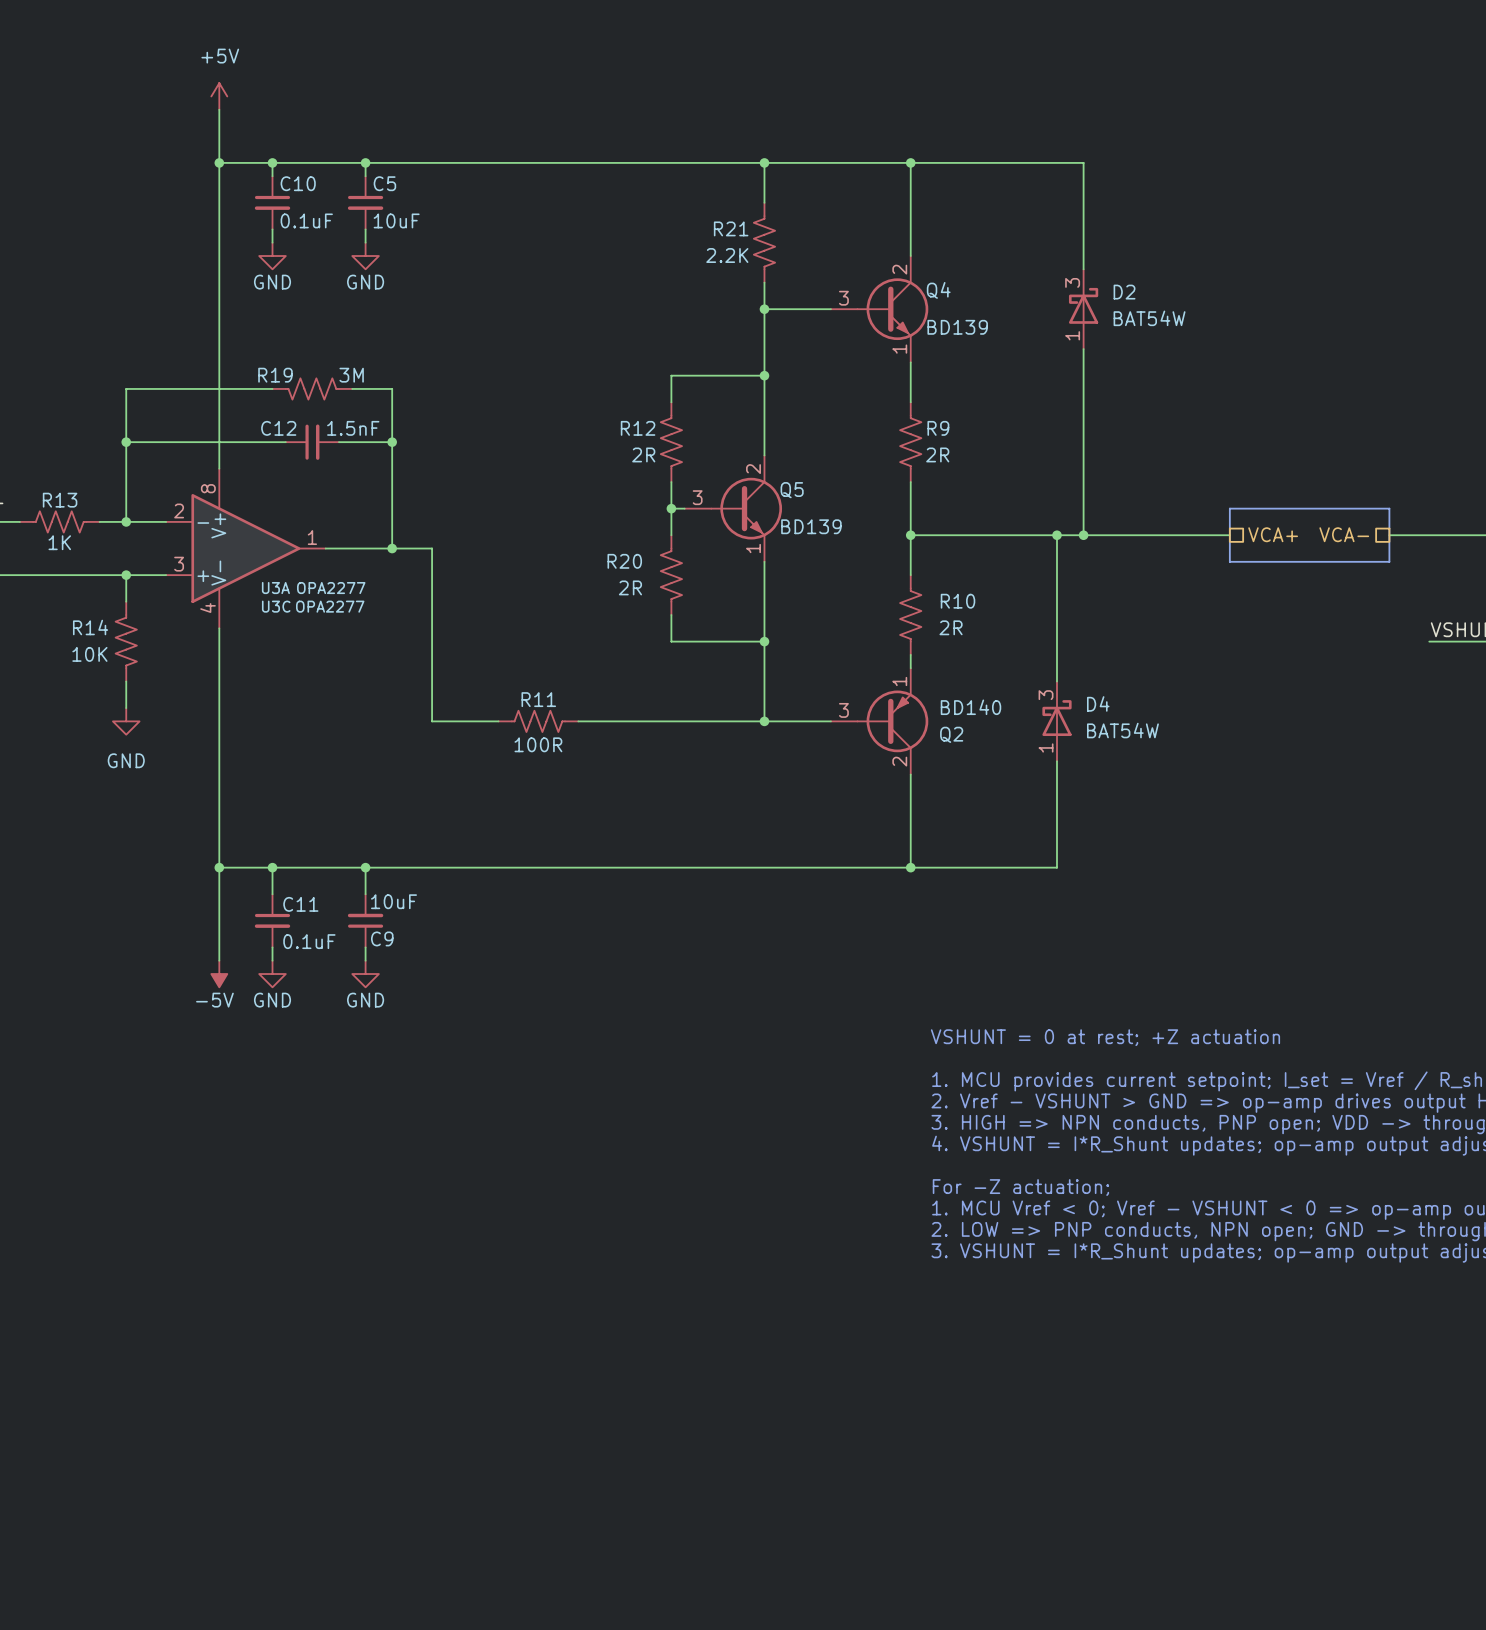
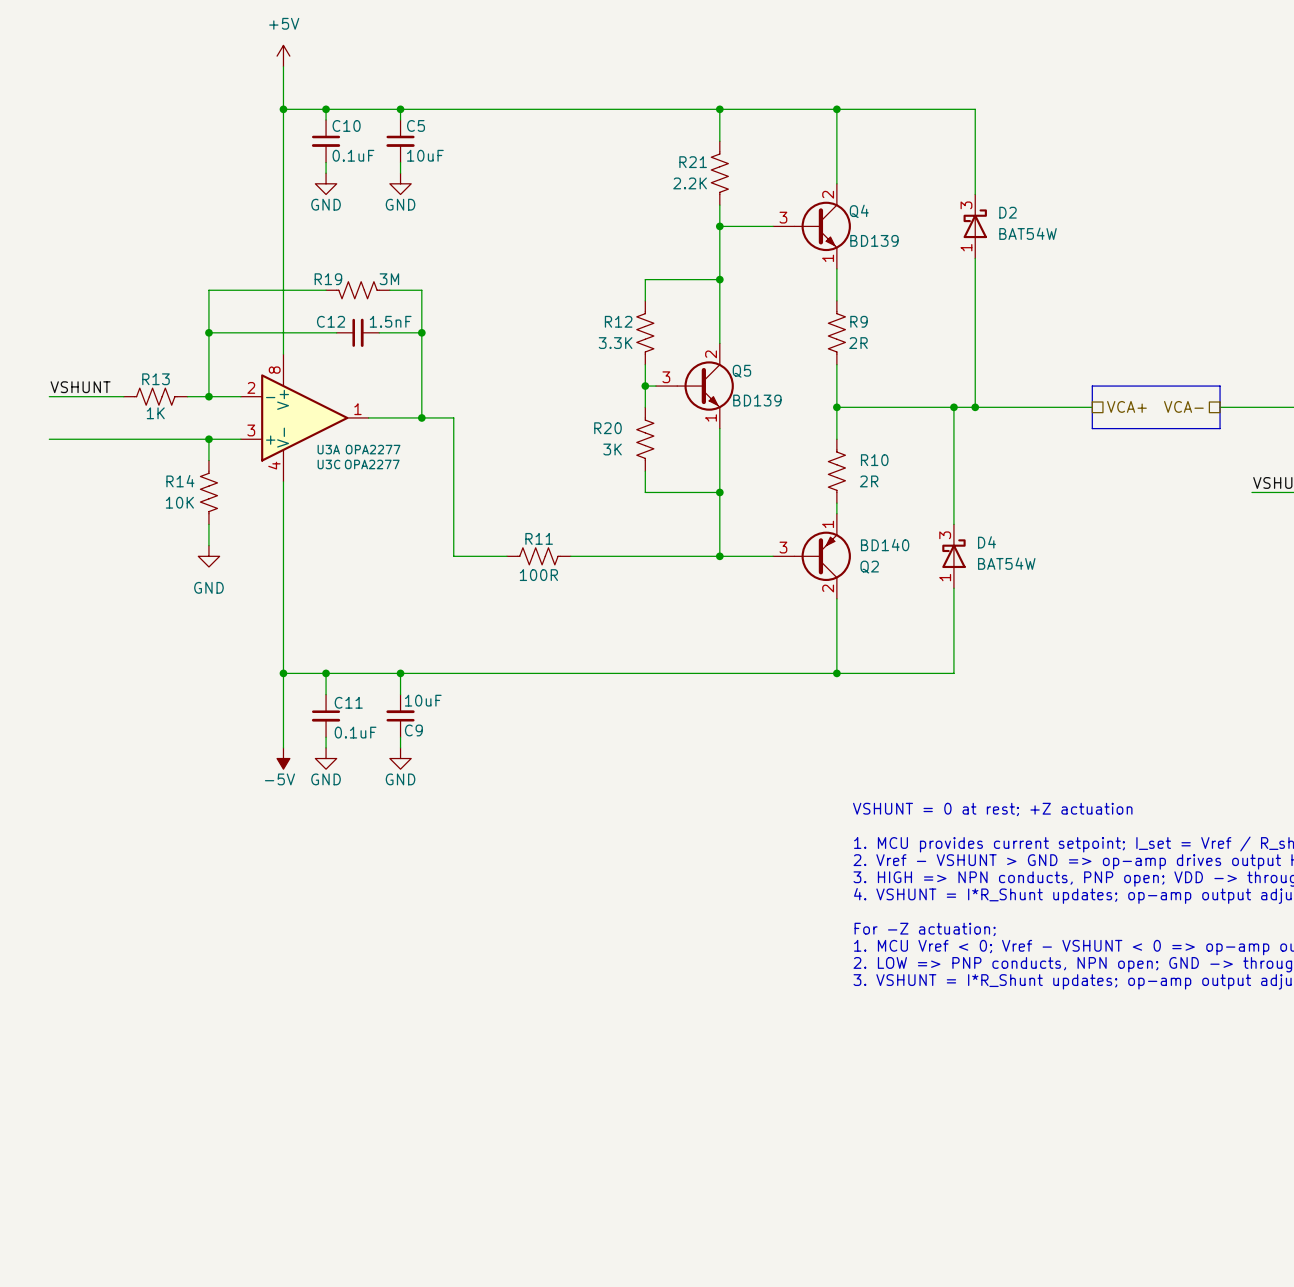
R12 value: 2R (643, 454) -> 3.3K (615, 343)
R20 flip: as is (671, 575) -> left-right (645, 439)
R20 value: 2R (630, 587) -> 3K (612, 449)

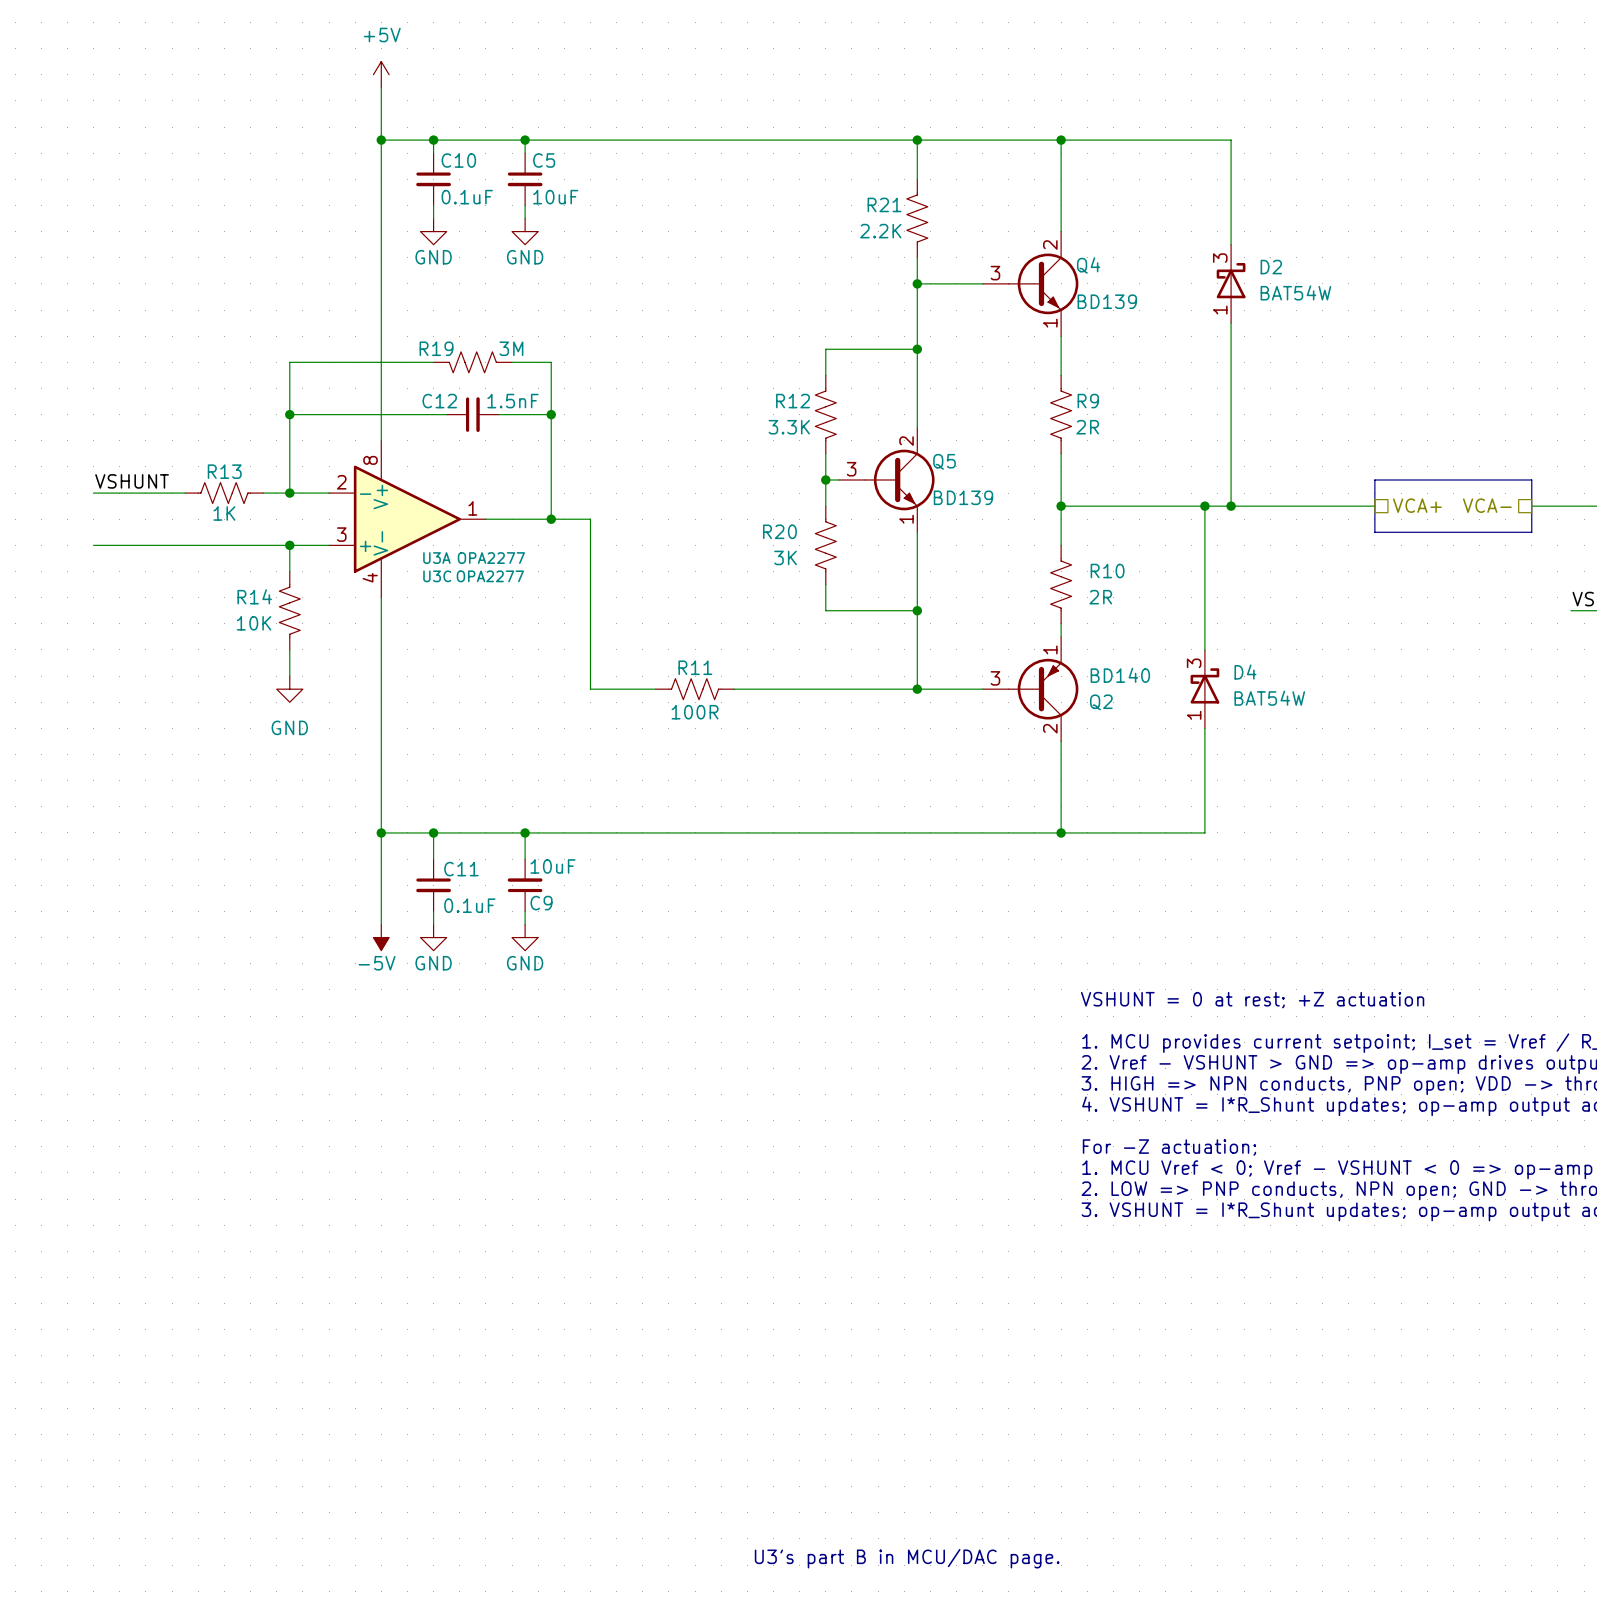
text: none -> U3's part B in MCU/DAC page. (907, 1558)

